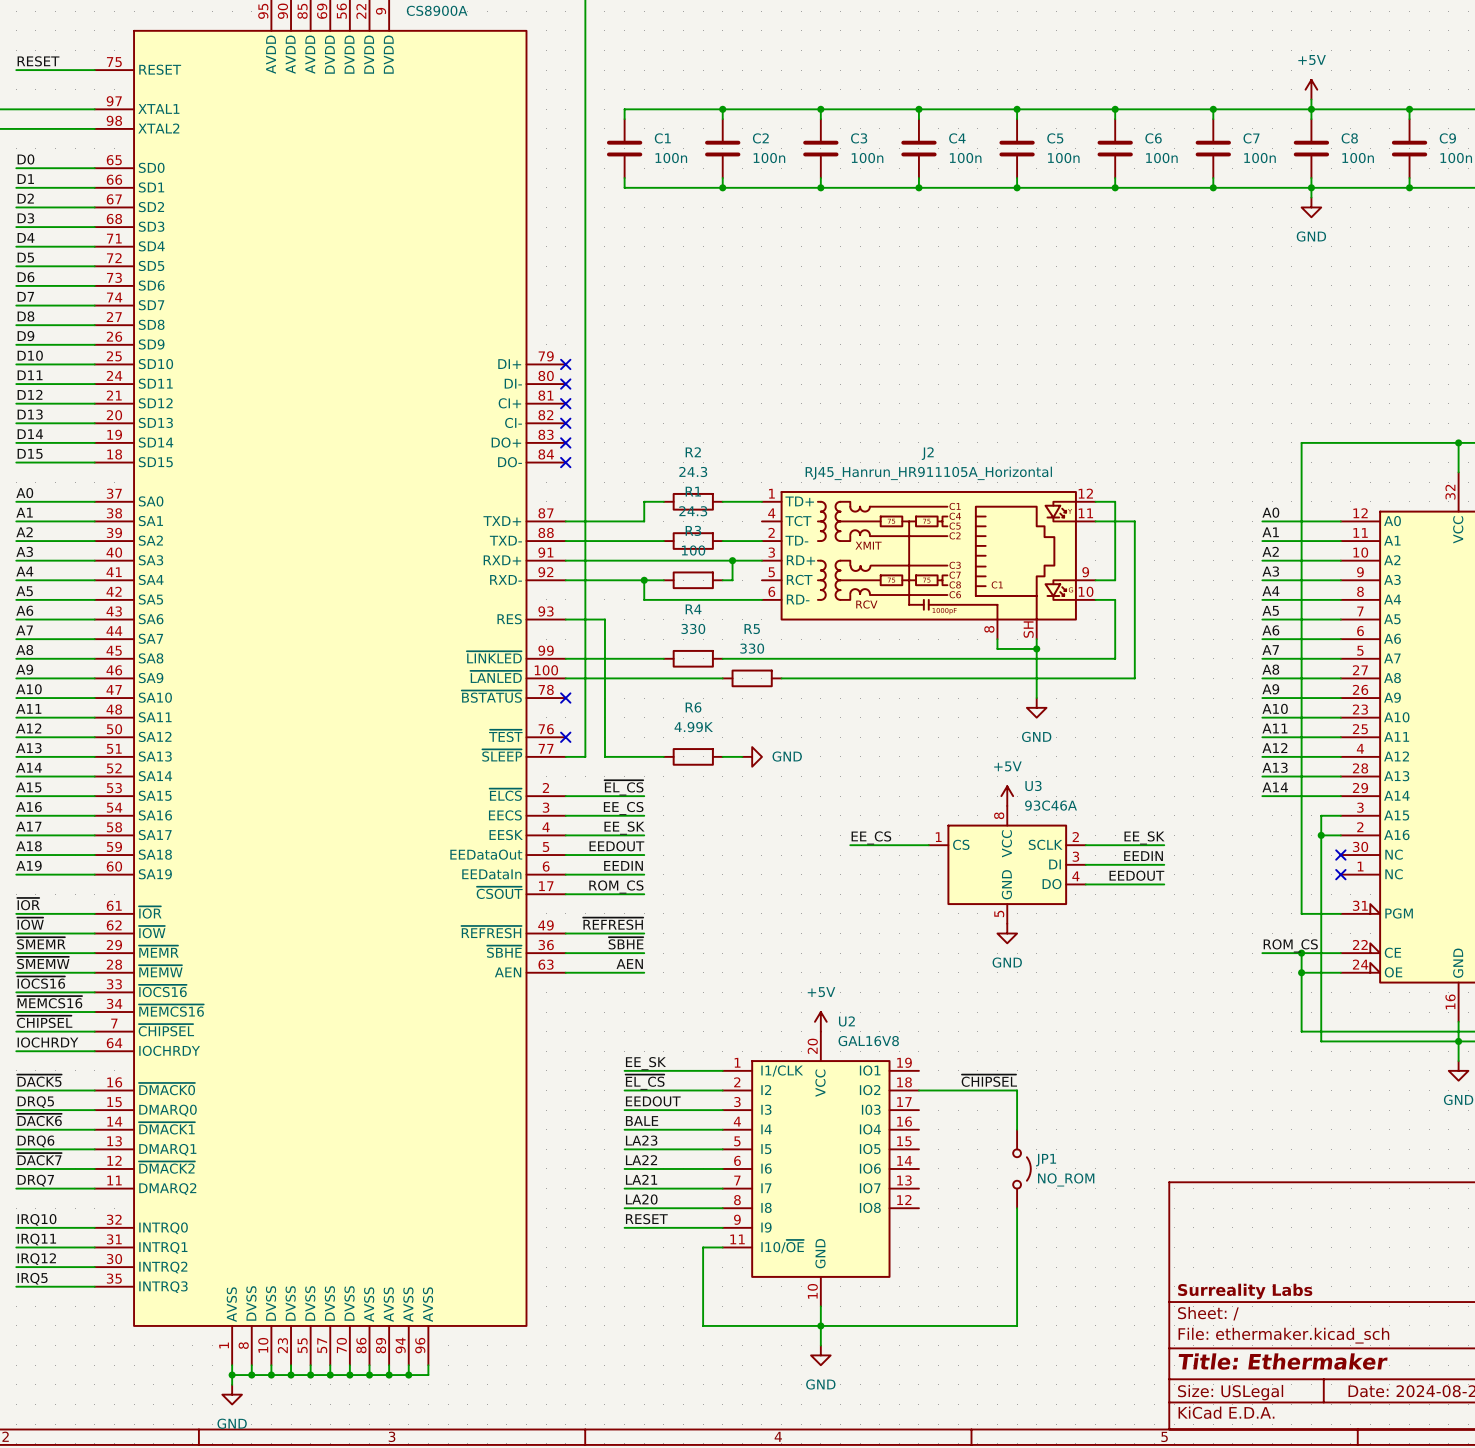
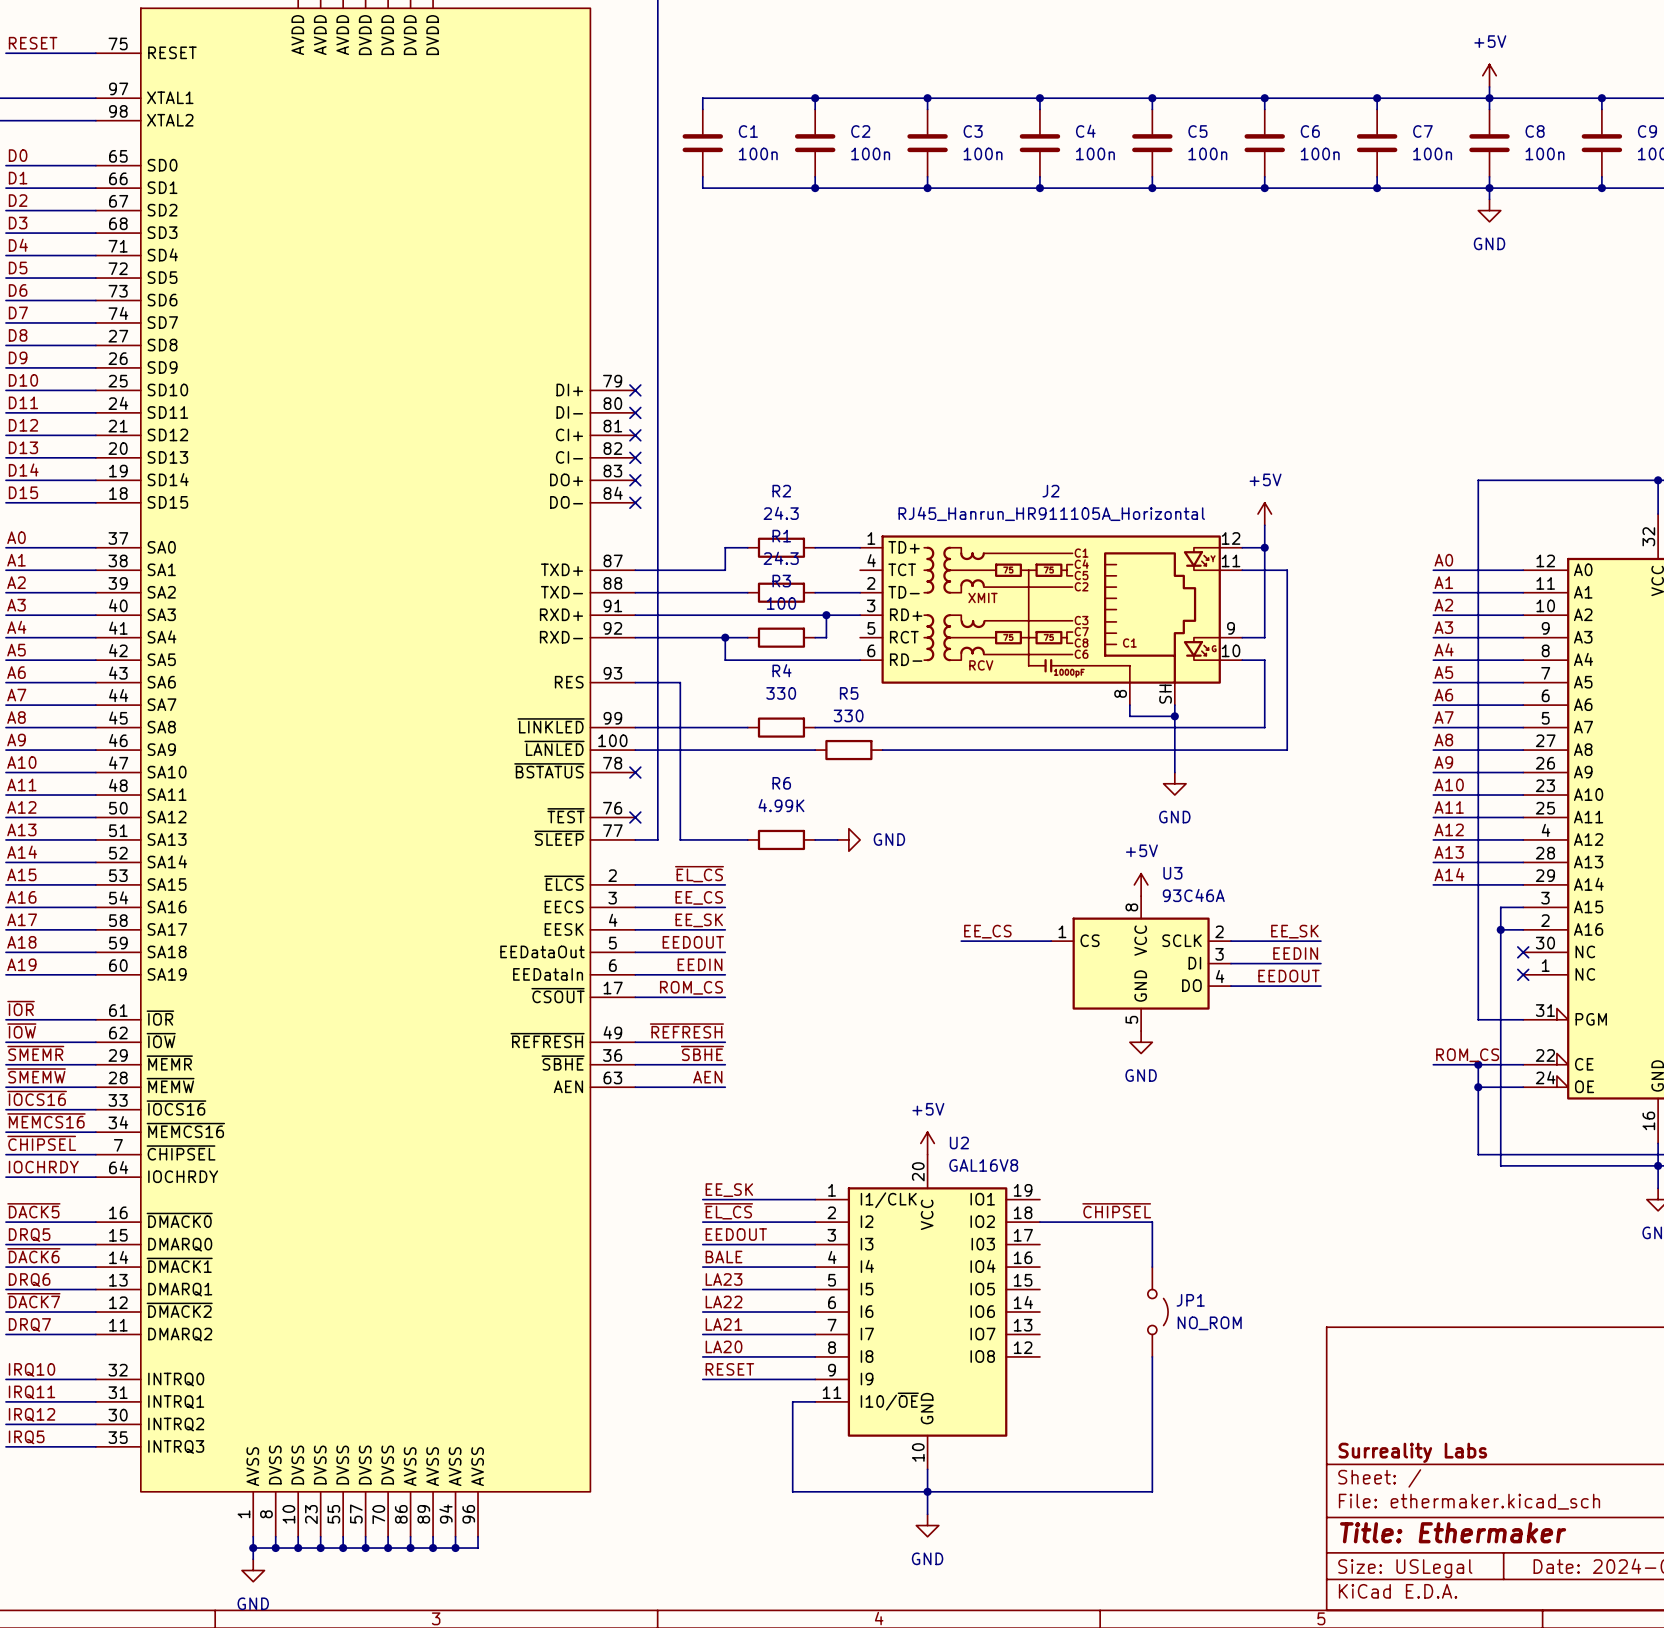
power symbol: none -> +5V (1264, 514)
wire: none -> (1264, 525) (1264, 547)
junction: none -> (1264, 547)

